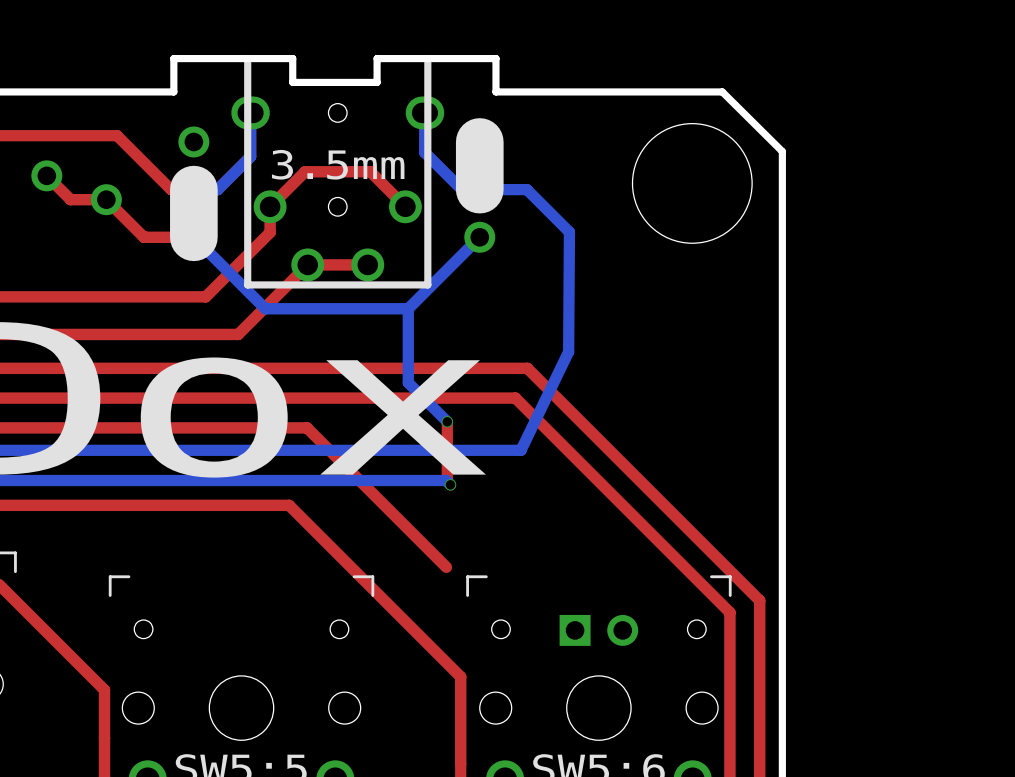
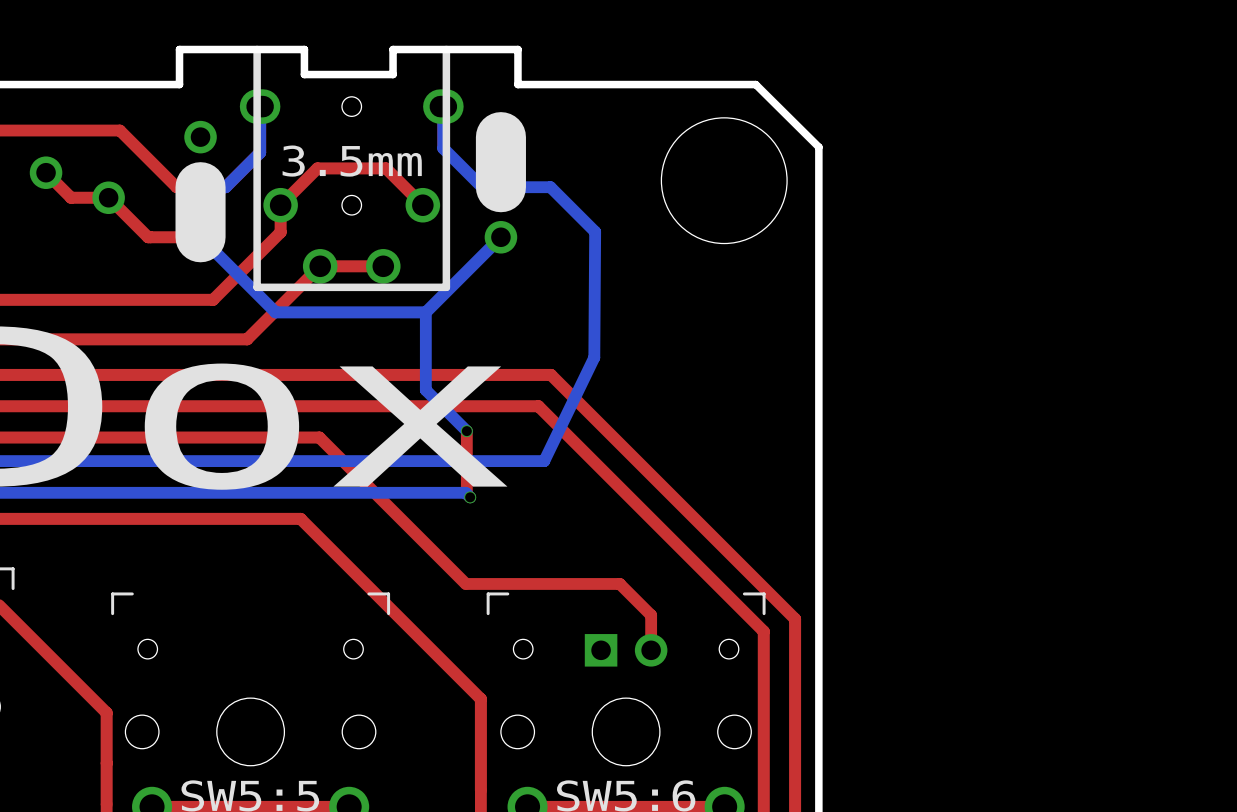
top track: none -> (465, 583) (619, 583) (651, 615) (651, 650)

